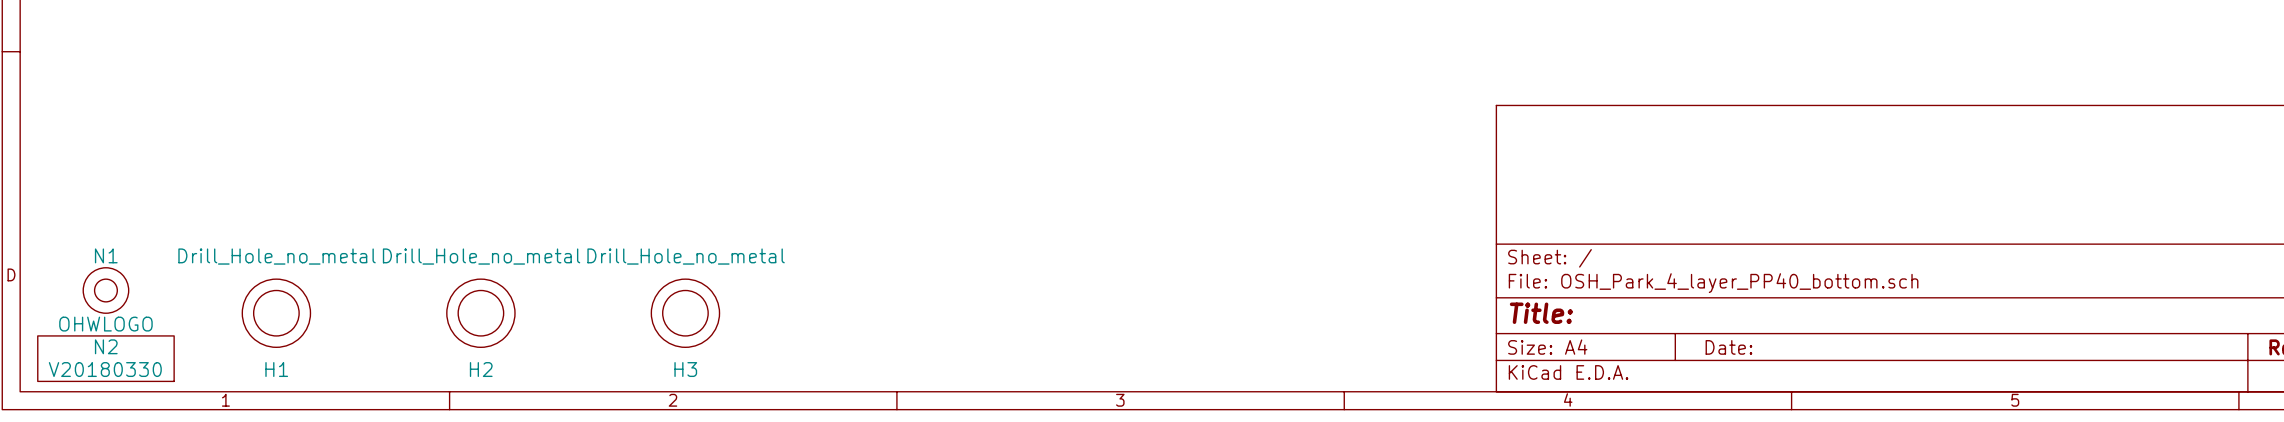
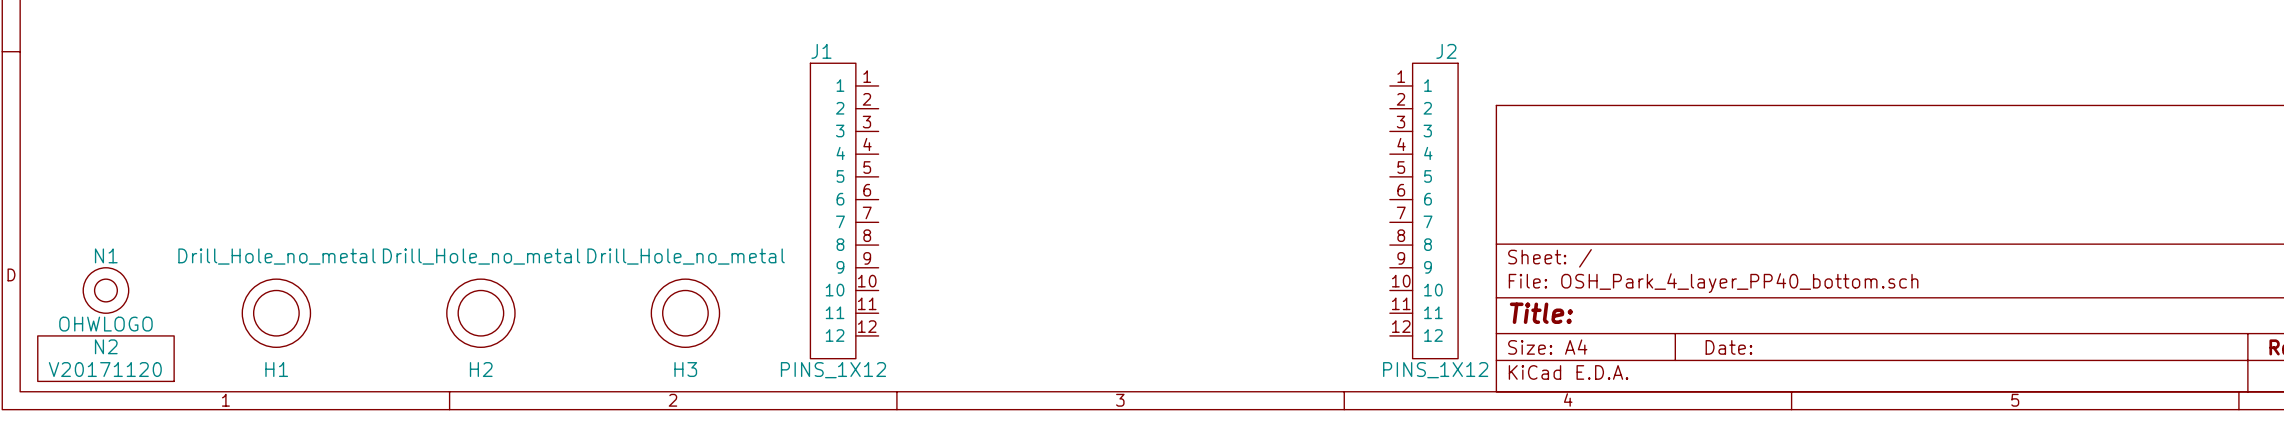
J1: none -> PINS_1X12 (844, 210)
J2: none -> PINS_1X12 (1423, 210)
N2 value: V20180330 (105, 369) -> V20171120 (105, 369)

